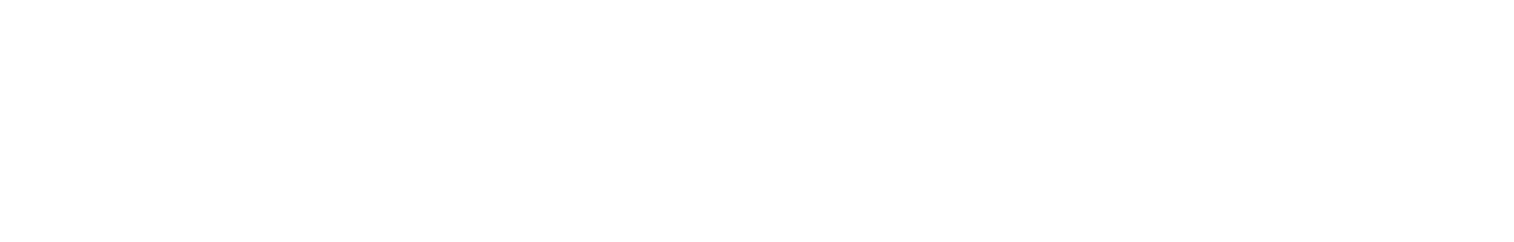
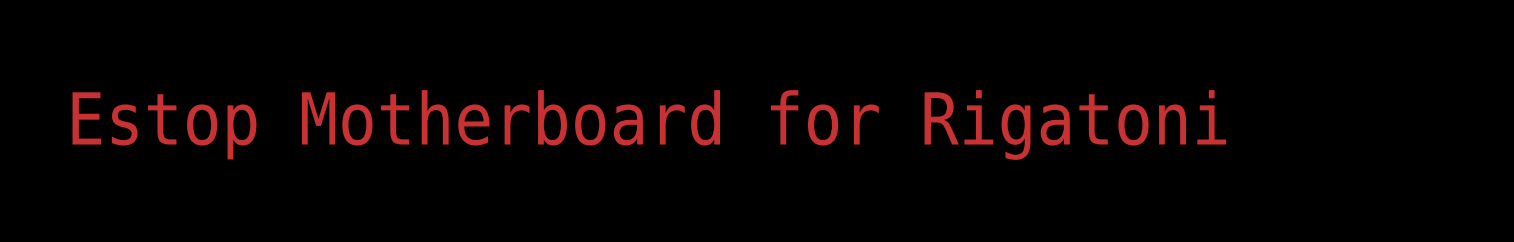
text: none -> Estop Motherboard for Rigatoni (649, 125)

